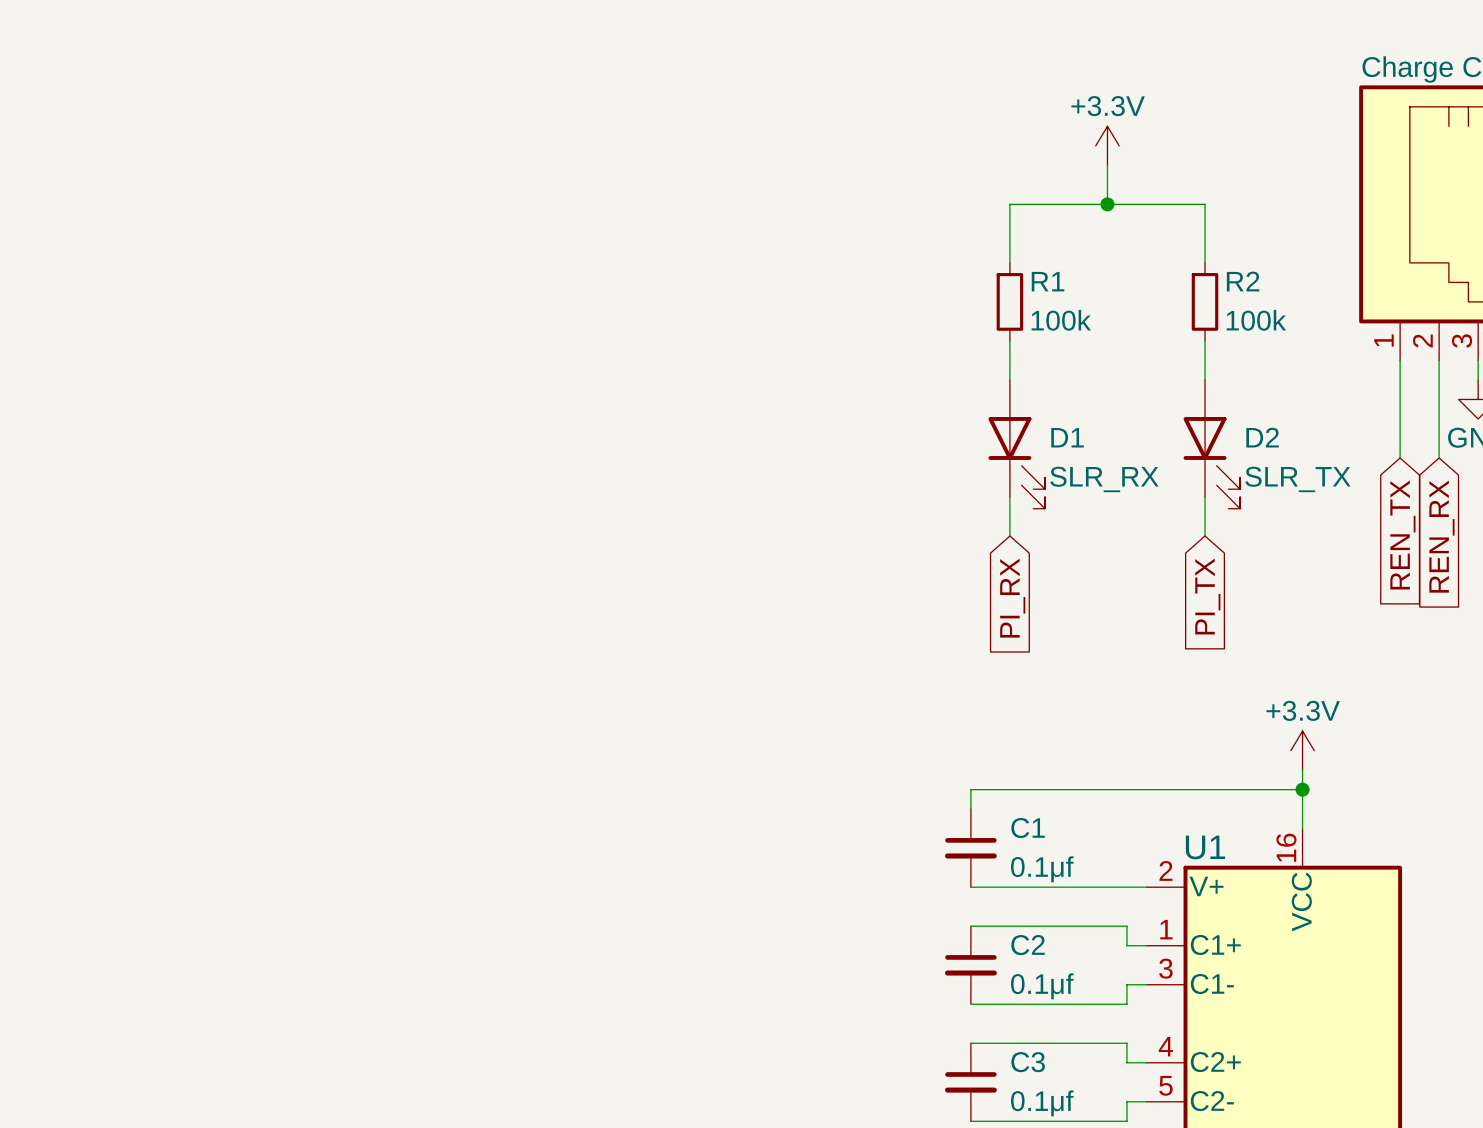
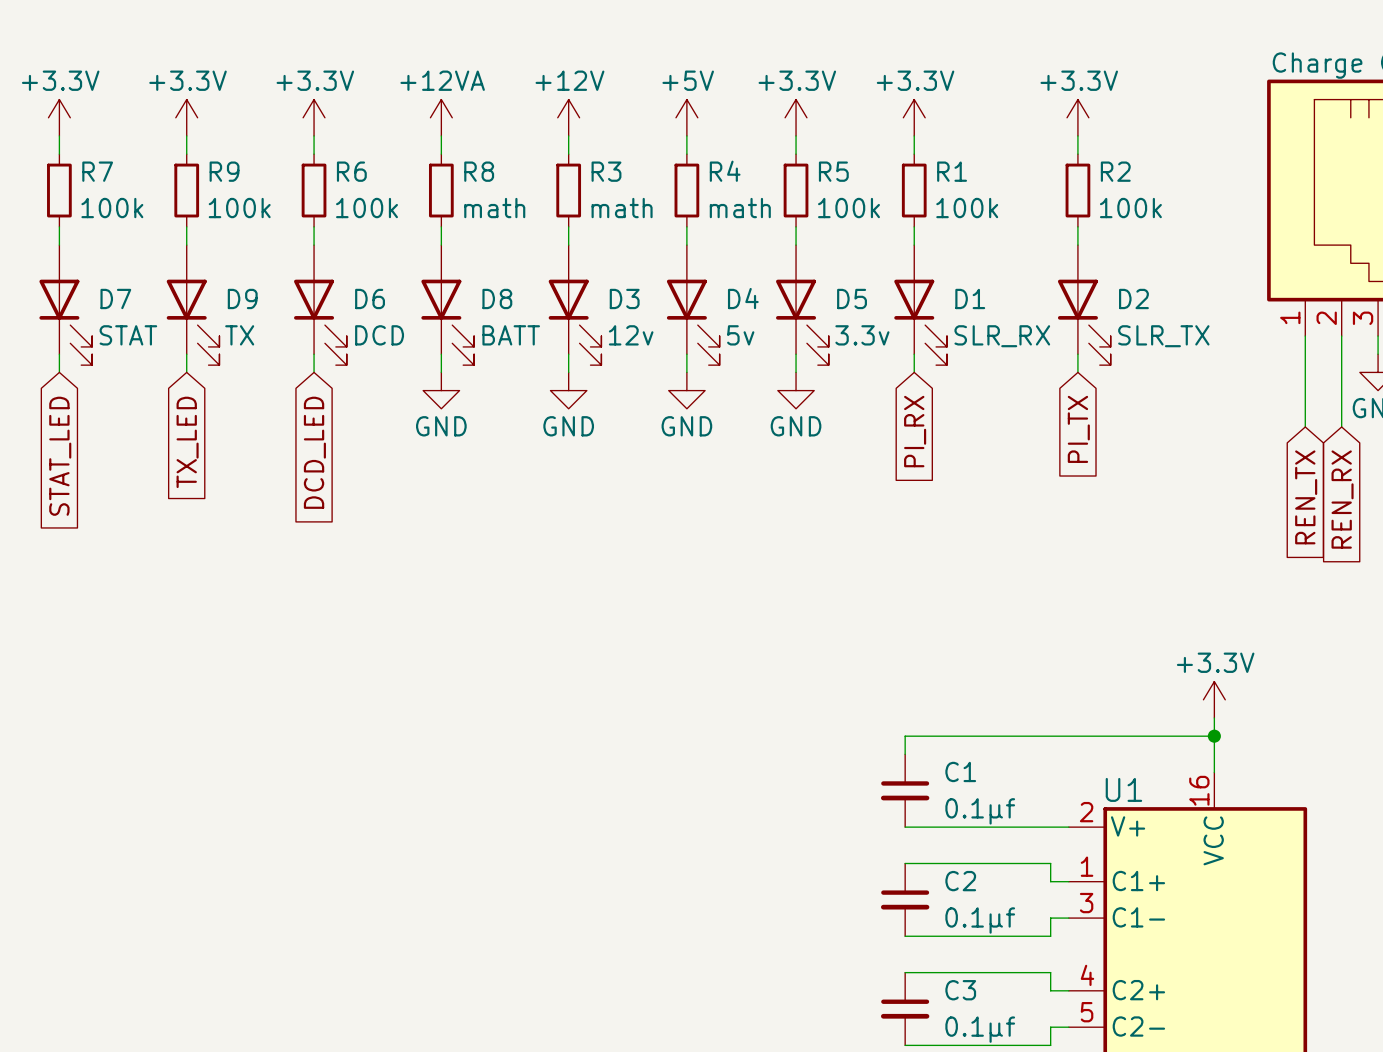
power symbol: none -> +3.3V (59, 117)
power symbol: none -> +3.3V (186, 117)
power symbol: none -> +3.3V (314, 117)
power symbol: none -> +12VA (441, 117)
power symbol: none -> +12V (568, 117)
power symbol: none -> +5V (686, 117)
power symbol: none -> +3.3V (796, 117)
power symbol: none -> +3.3V (914, 117)
wire: none -> (59, 135) (59, 154)
wire: none -> (186, 135) (186, 154)
wire: none -> (314, 135) (314, 154)
wire: none -> (441, 135) (441, 154)
wire: none -> (568, 135) (568, 154)
wire: none -> (686, 135) (686, 154)
wire: none -> (796, 135) (796, 154)
wire: none -> (914, 135) (914, 154)
power symbol position: +3.3V (1107, 145) -> +3.3V (1077, 117)
wire: none -> (1077, 135) (1077, 154)
wire: (1107, 165) (1107, 204) -> none
R7: none -> 100k (59, 190)
R9: none -> 100k (186, 190)
R6: none -> 100k (314, 190)
R8: none -> math (441, 190)
R3: none -> math (568, 190)
R4: none -> math (686, 190)
R5: none -> 100k (796, 190)
junction: (1107, 204) -> none
wire: none -> (59, 226) (59, 245)
wire: none -> (186, 226) (186, 245)
wire: none -> (314, 226) (314, 245)
wire: none -> (441, 226) (441, 245)
wire: none -> (568, 226) (568, 245)
wire: none -> (686, 226) (686, 245)
wire: none -> (796, 226) (796, 245)
wire: none -> (914, 226) (914, 245)
wire: none -> (1077, 226) (1077, 245)
wire: (1009, 262) (1009, 204) (1205, 204) (1205, 262) -> none
R1 position: (1009, 301) -> (914, 190)
R2 position: (1205, 301) -> (1077, 190)
D7: none -> STAT (65, 305)
D9: none -> TX (193, 305)
D6: none -> DCD (320, 305)
D8: none -> BATT (447, 305)
D3: none -> 12v (575, 305)
D4: none -> 5v (693, 305)
D5: none -> 3.3v (802, 305)
wire: (1009, 340) (1009, 379) -> none
wire: (1205, 340) (1205, 379) -> none
wire: none -> (59, 354) (59, 372)
wire: none -> (186, 354) (186, 372)
wire: none -> (314, 354) (314, 372)
wire: none -> (441, 354) (441, 372)
wire: none -> (568, 354) (568, 372)
wire: none -> (686, 354) (686, 372)
wire: none -> (796, 354) (796, 372)
wire: none -> (914, 354) (914, 372)
wire: none -> (1077, 354) (1077, 372)
power symbol: none -> GND (441, 390)
power symbol: none -> GND (568, 390)
power symbol: none -> GND (686, 390)
power symbol: none -> GND (796, 390)
D1 position: (1016, 444) -> (920, 305)
D2 position: (1211, 444) -> (1084, 305)
global label: none -> TX_LED (187, 442)
global label: none -> DCD_LED (314, 452)
global label: none -> STAT_LED (60, 456)
wire: (1009, 497) (1009, 536) -> none
wire: (1205, 497) (1205, 536) -> none
global label position: PI_TX (1207, 596) -> PI_TX (1078, 429)
global label position: PI_RX (1012, 598) -> PI_RX (915, 431)

